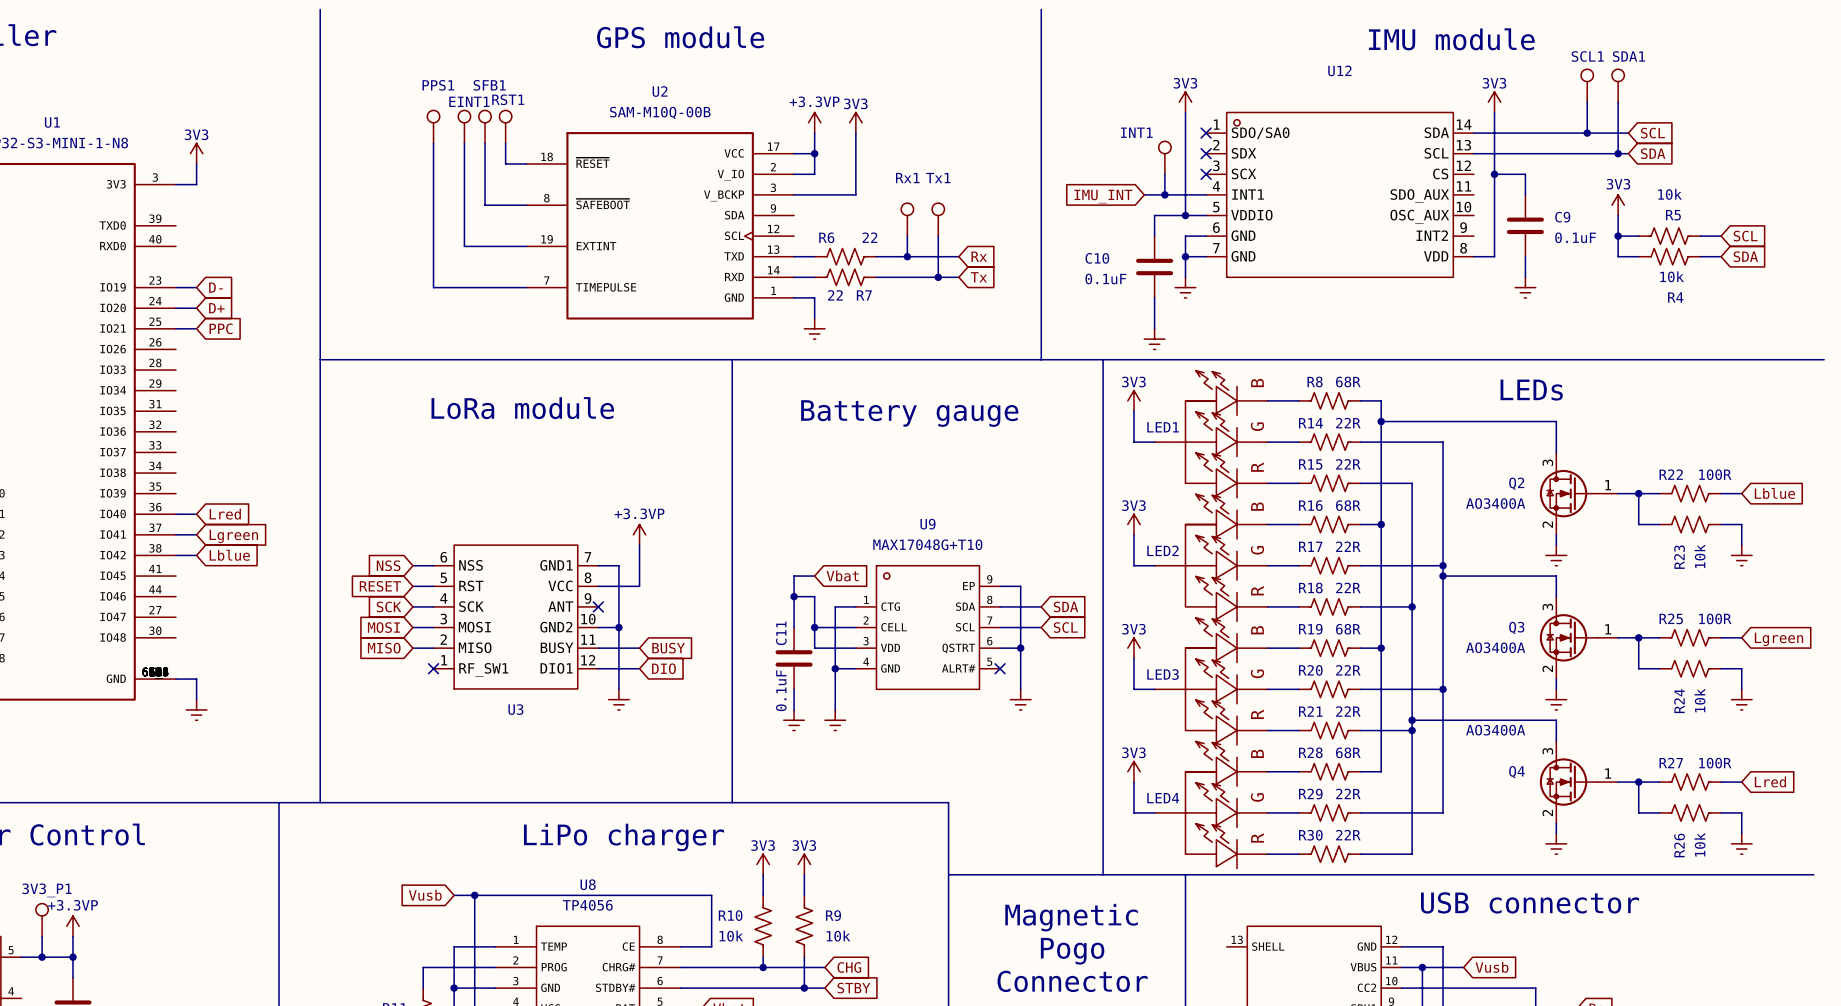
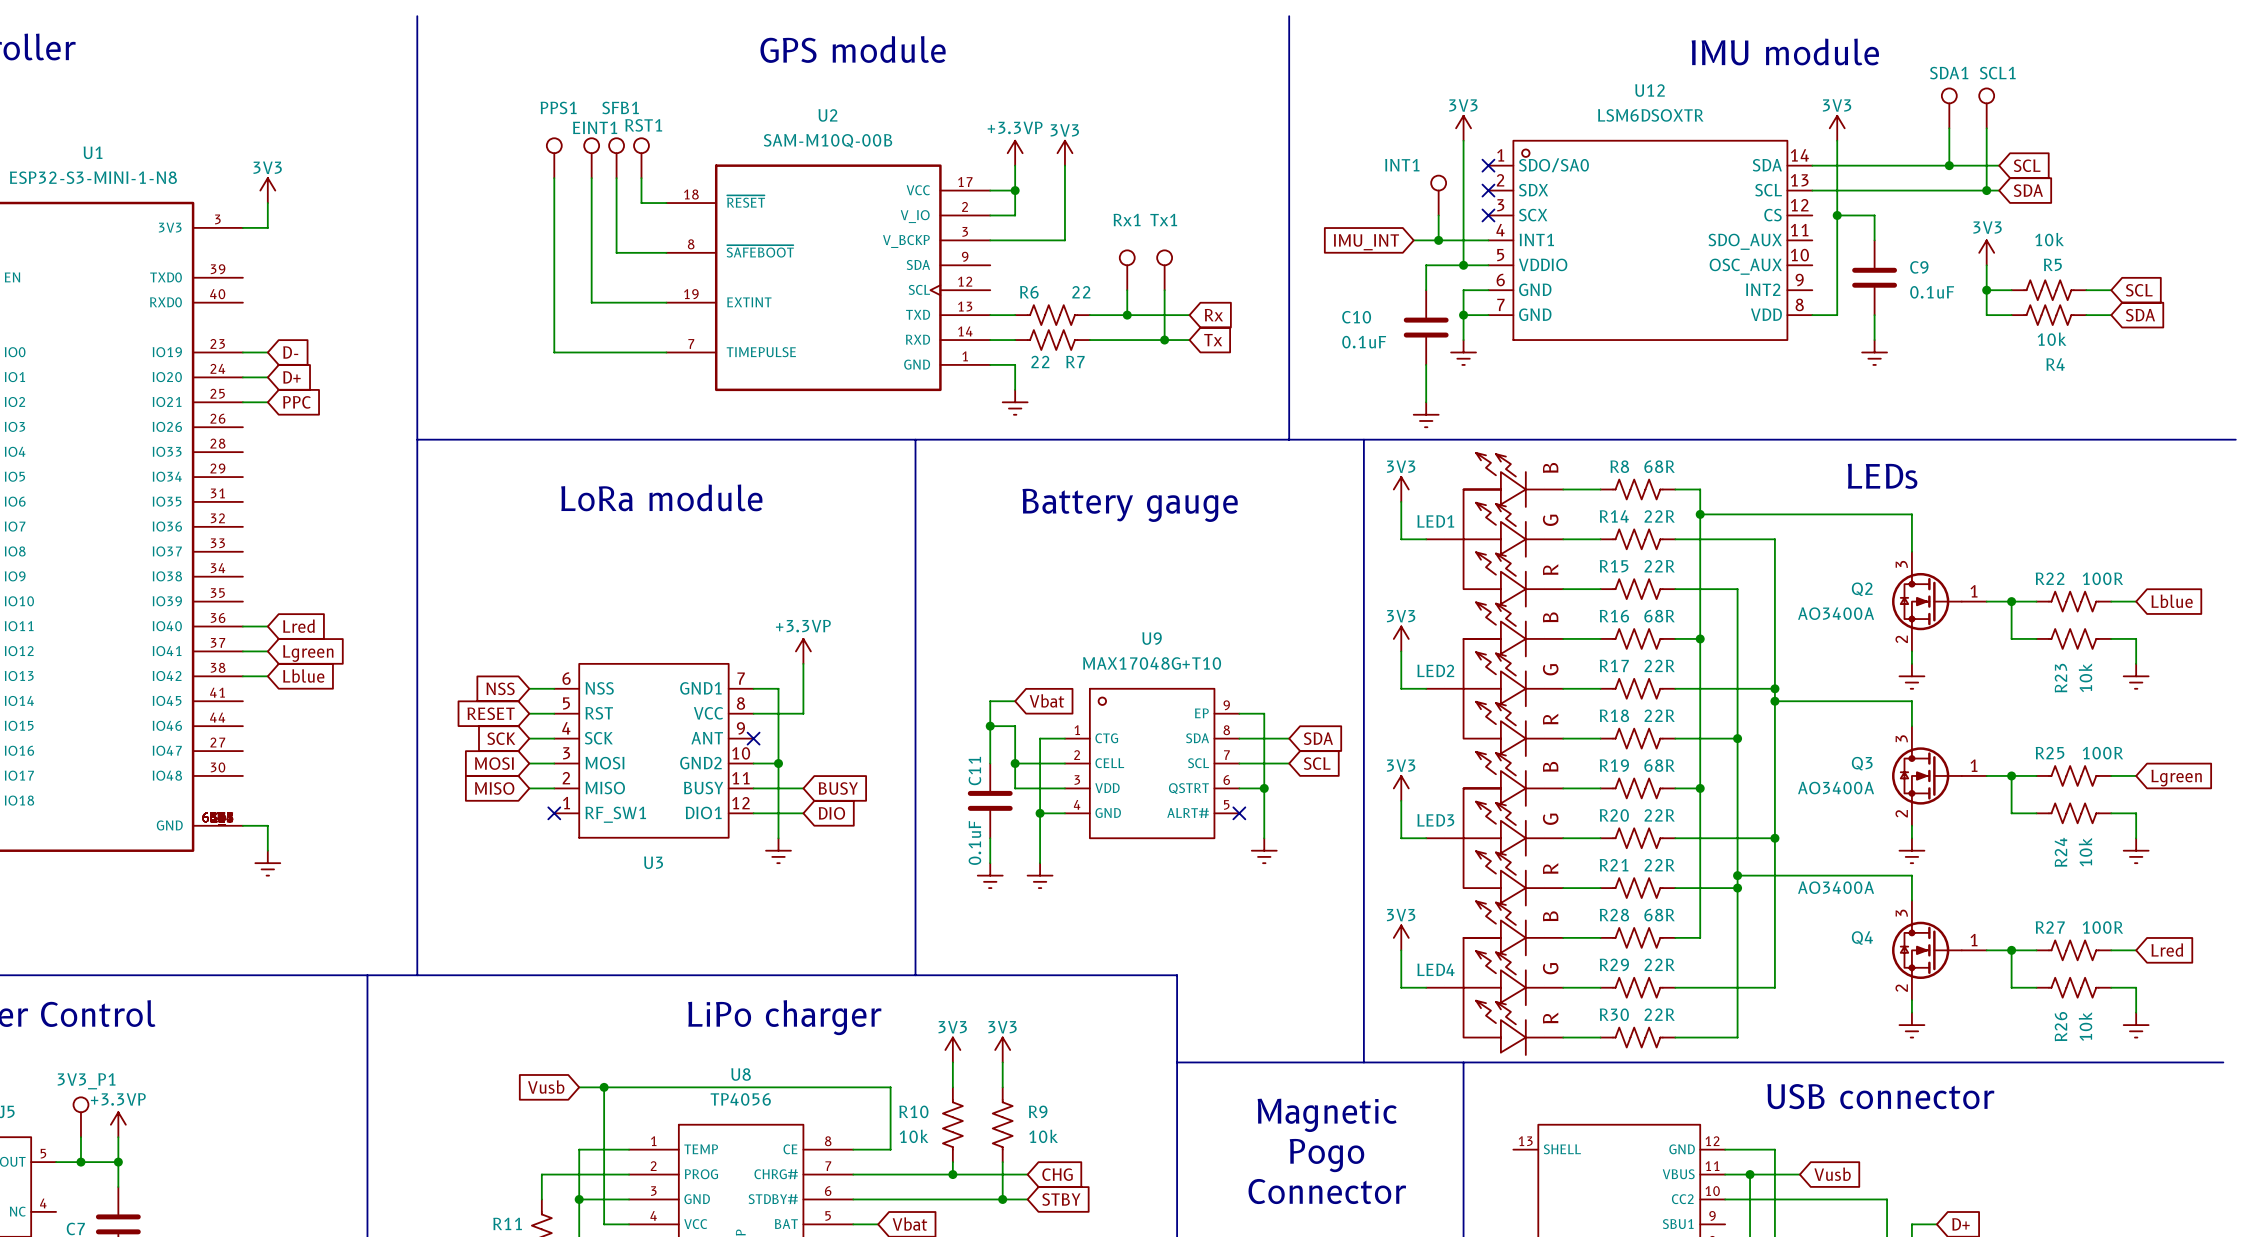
SCL1 name: SCL1 (1587, 56) -> SDA1 (1949, 73)
SDA1 name: SDA1 (1628, 56) -> SCL1 (1997, 73)
U12 value: none -> LSM6DSOXTR (1650, 115)

